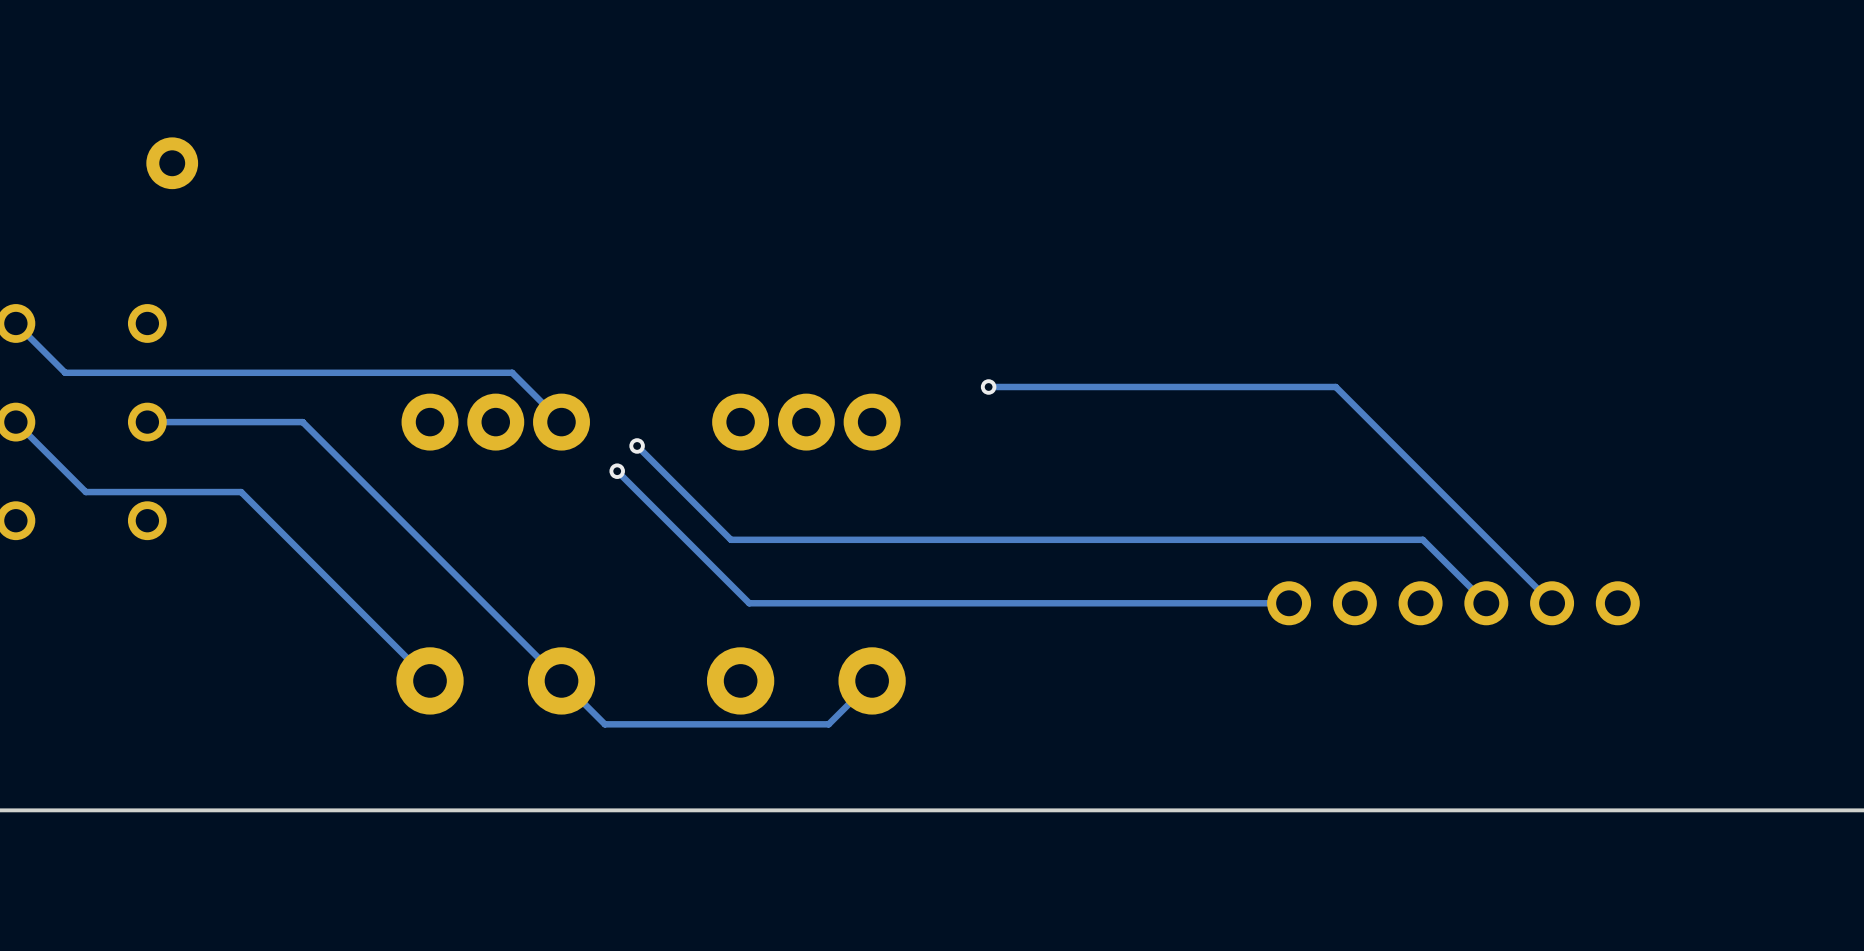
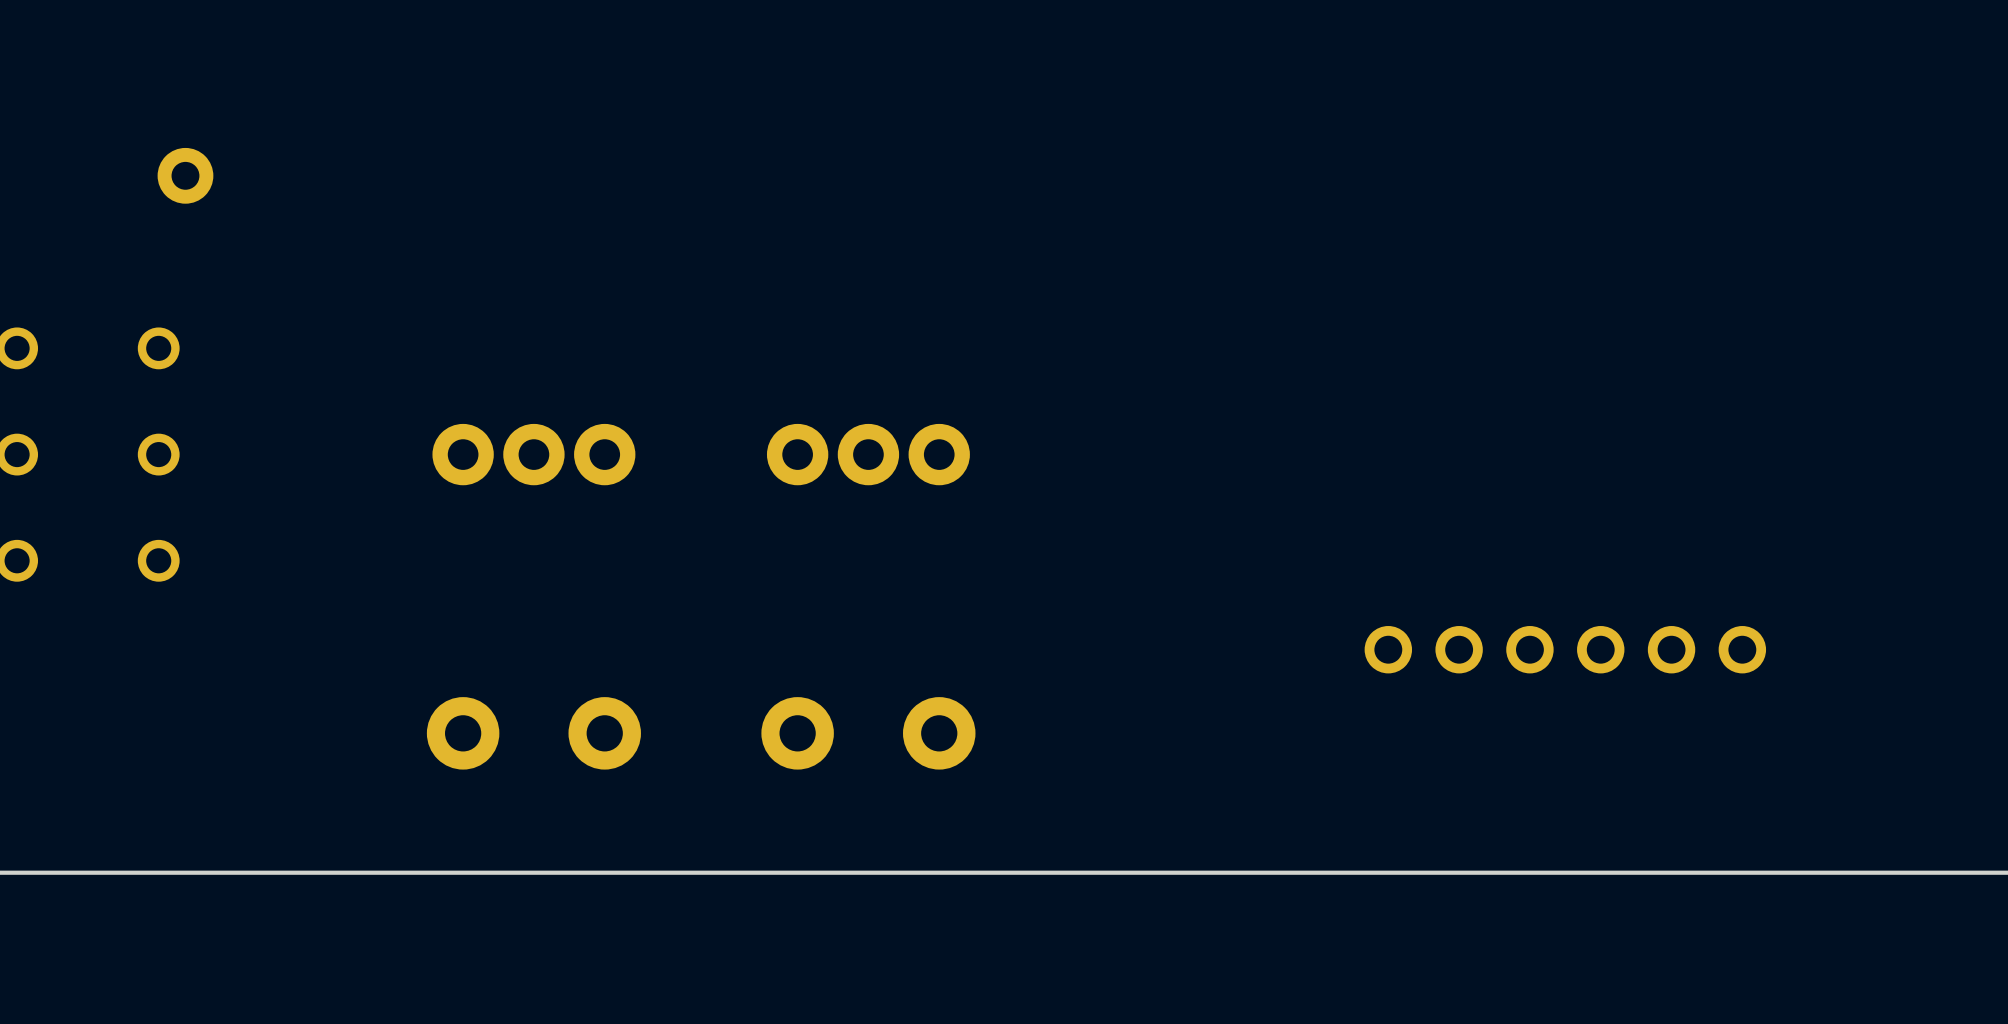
track: (15, 323) (65, 372) (512, 372) (561, 422) -> none
track: (988, 386) (1335, 386) (1552, 603) -> none
via: (988, 386) -> none
track: (15, 422) (85, 492) (241, 492) (430, 680) -> none
track: (147, 422) (302, 422) (604, 724) (828, 724) (872, 680) -> none
track: (637, 445) (730, 539) (1422, 539) (1486, 603) -> none
via: (637, 445) -> none
track: (617, 471) (749, 603) (1289, 603) -> none
via: (617, 471) -> none

